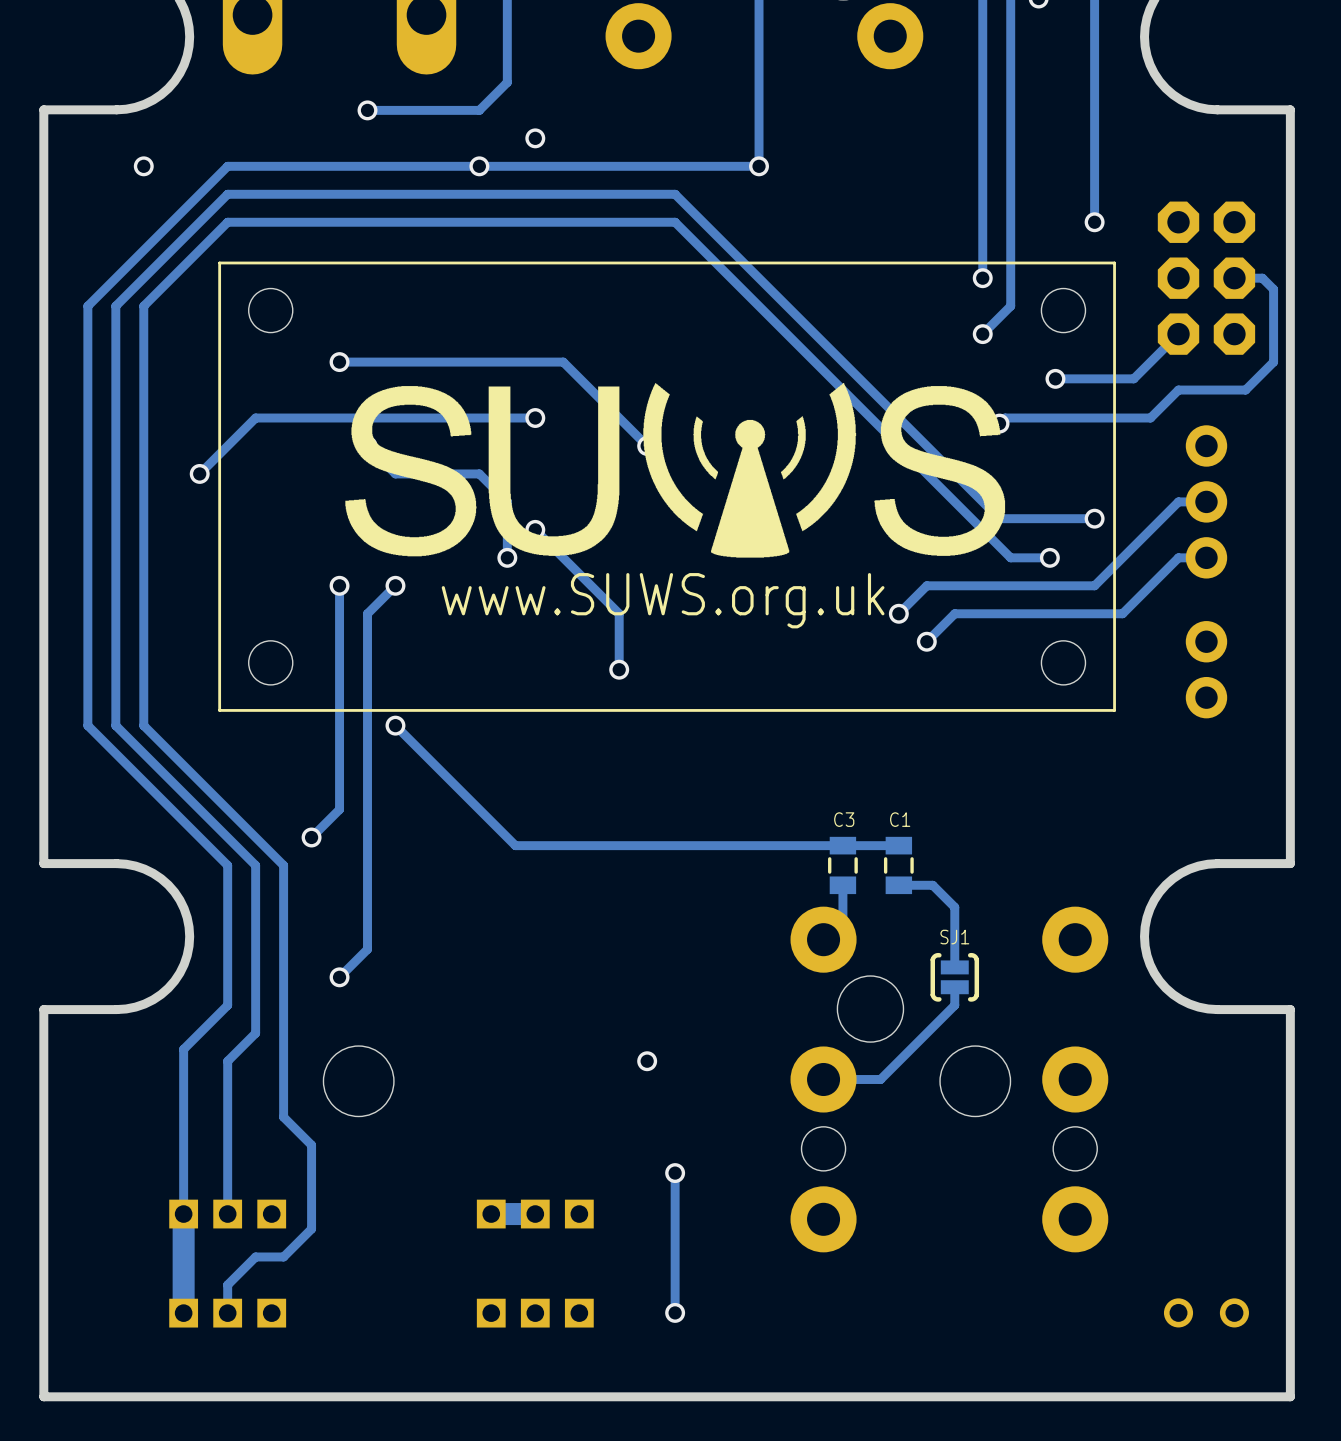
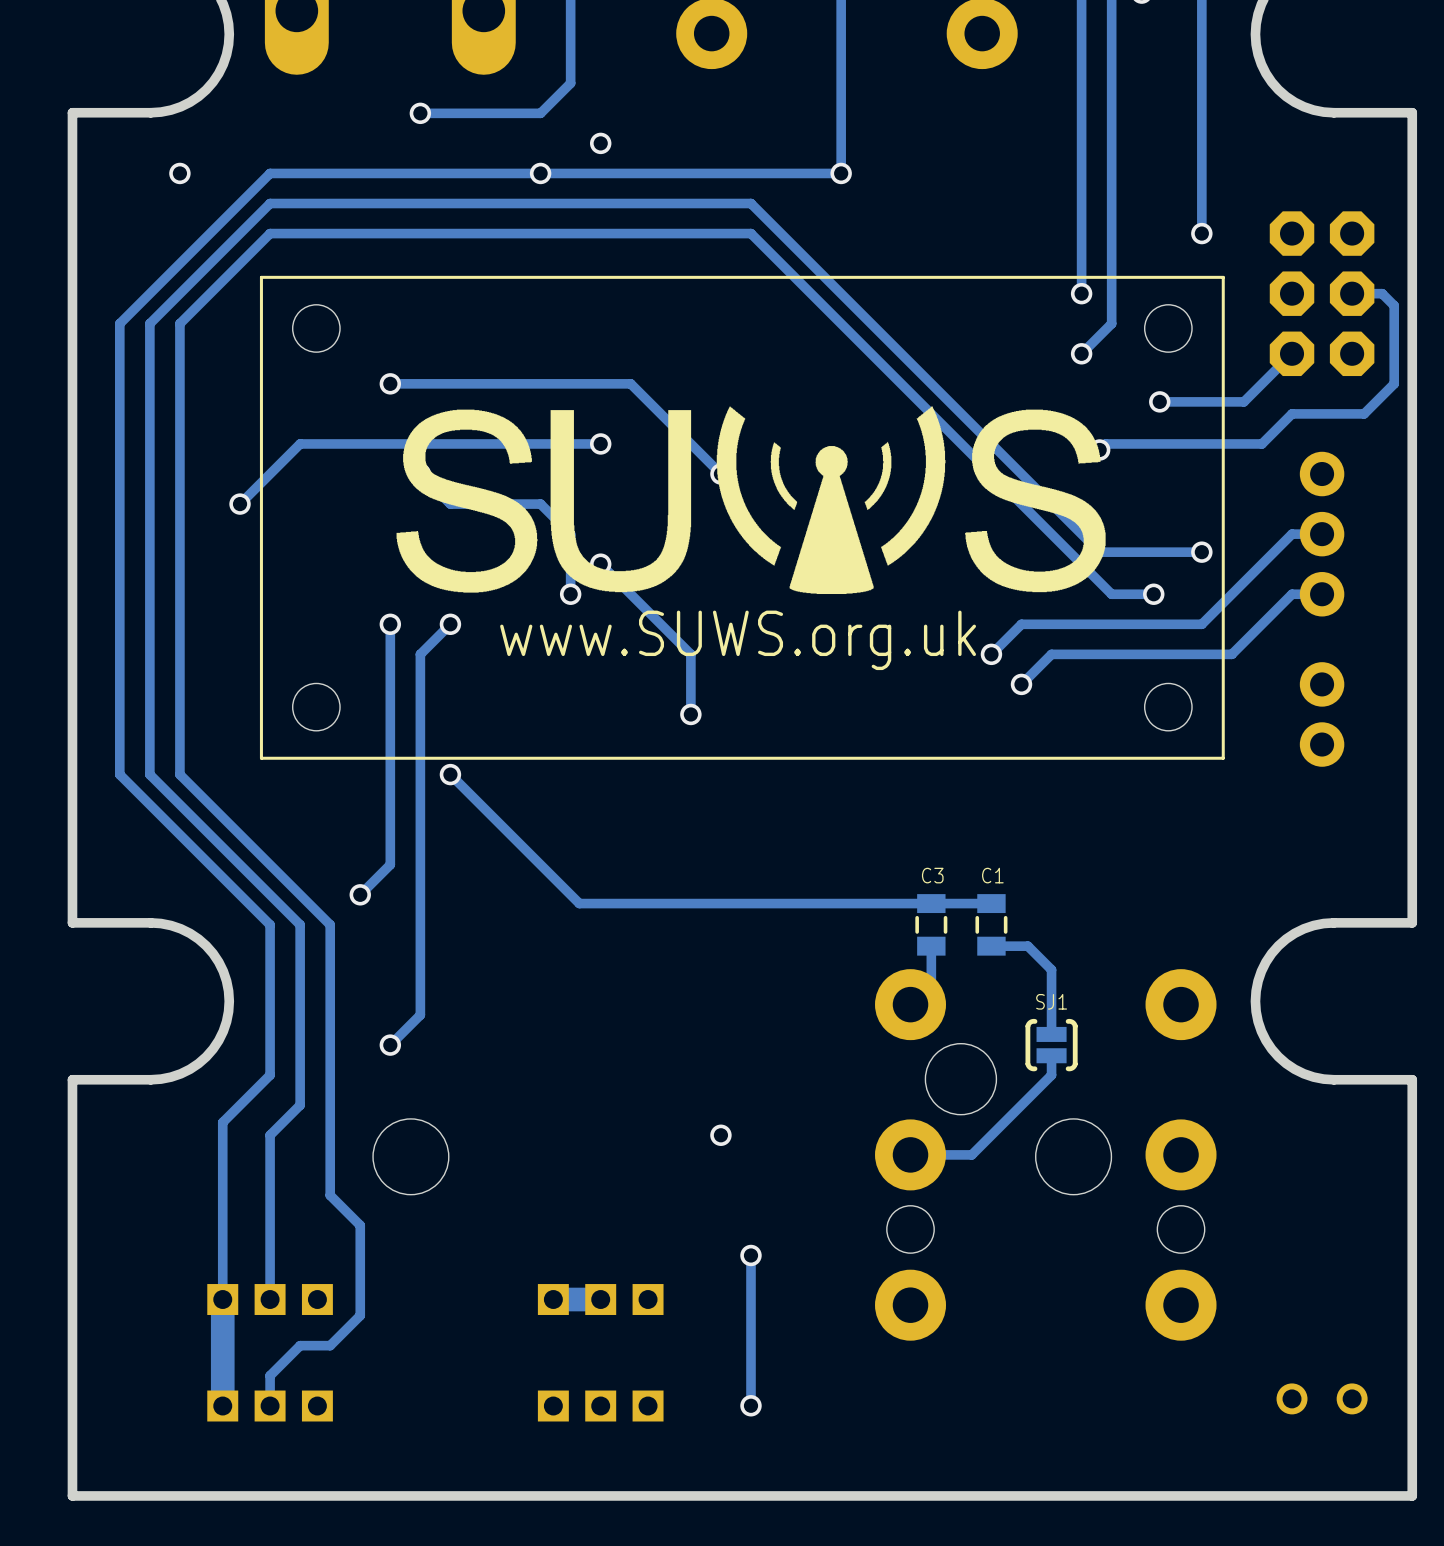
part footprint: [1163, 1298, 1249, 1328] -> [1276, 1383, 1368, 1415]

